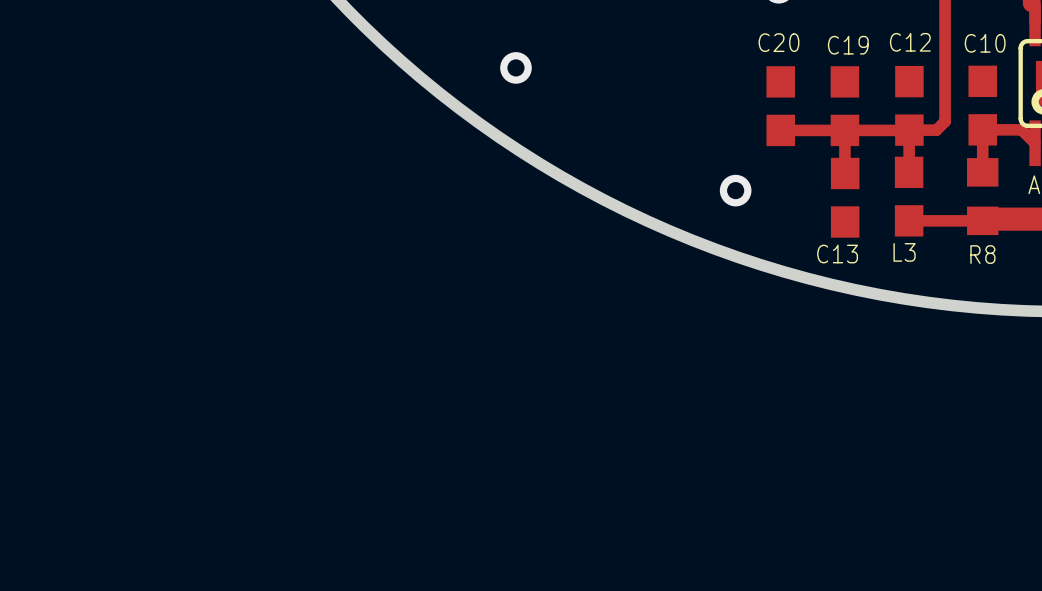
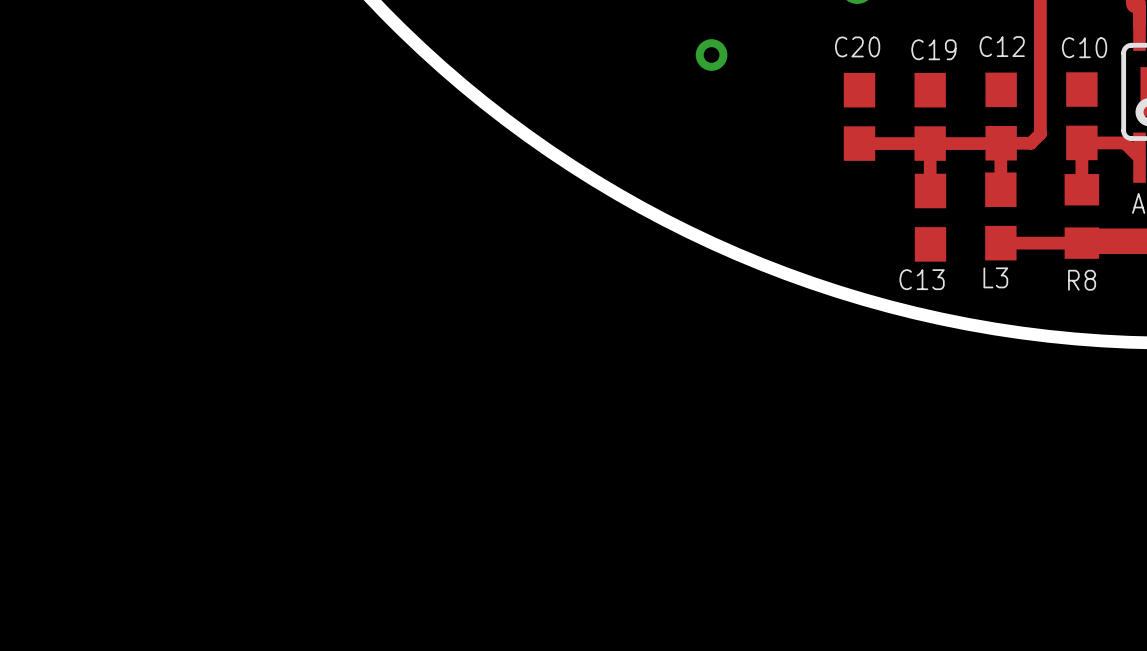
via: none -> (711, 55)
via: (515, 67) -> none
via: (735, 190) -> none

